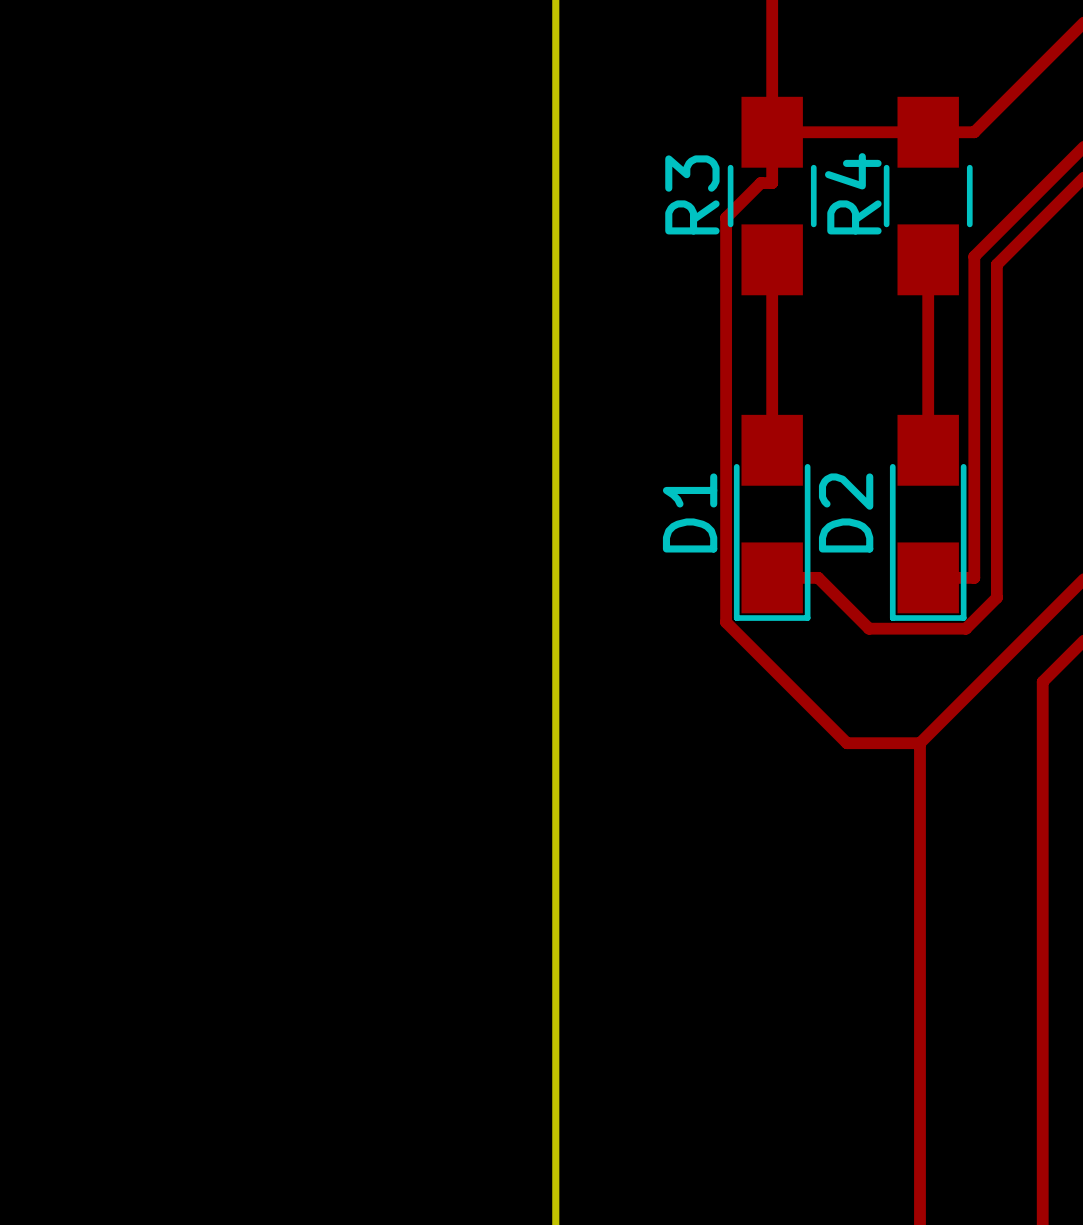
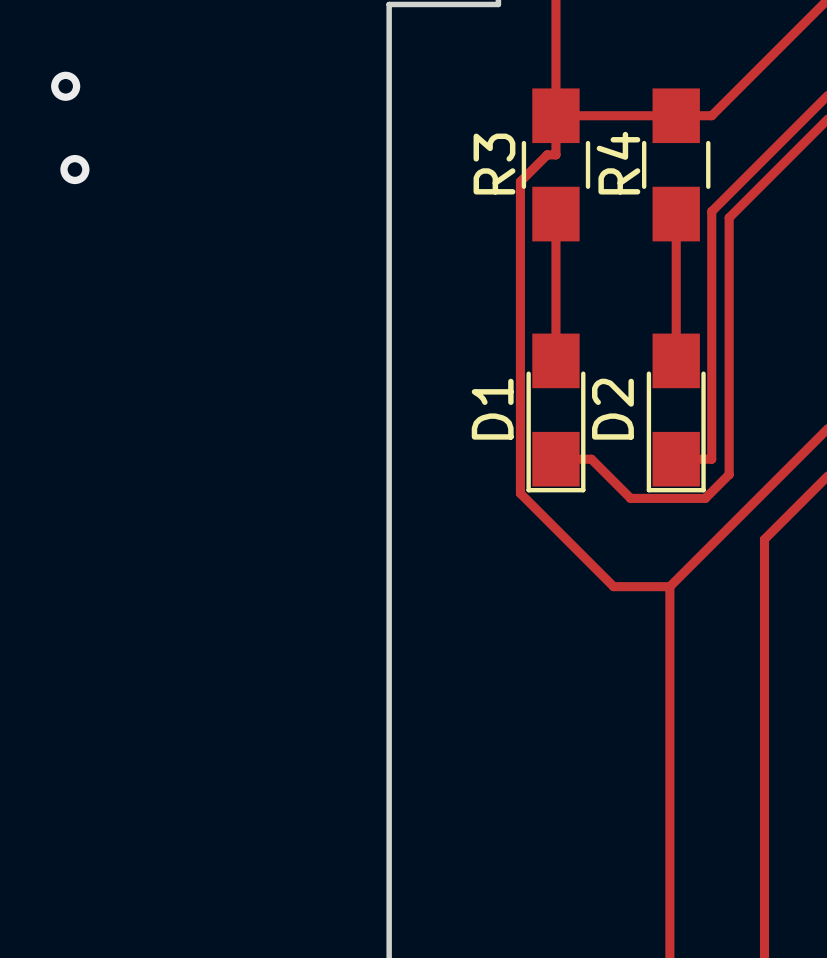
via: none -> (65, 86)
via: none -> (74, 169)

